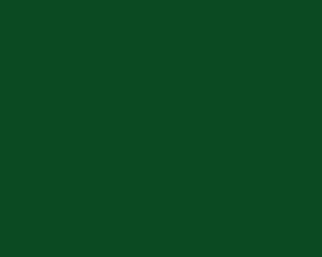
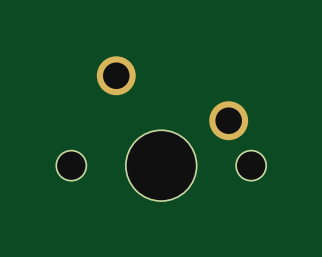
part: none -> (161, 128)

